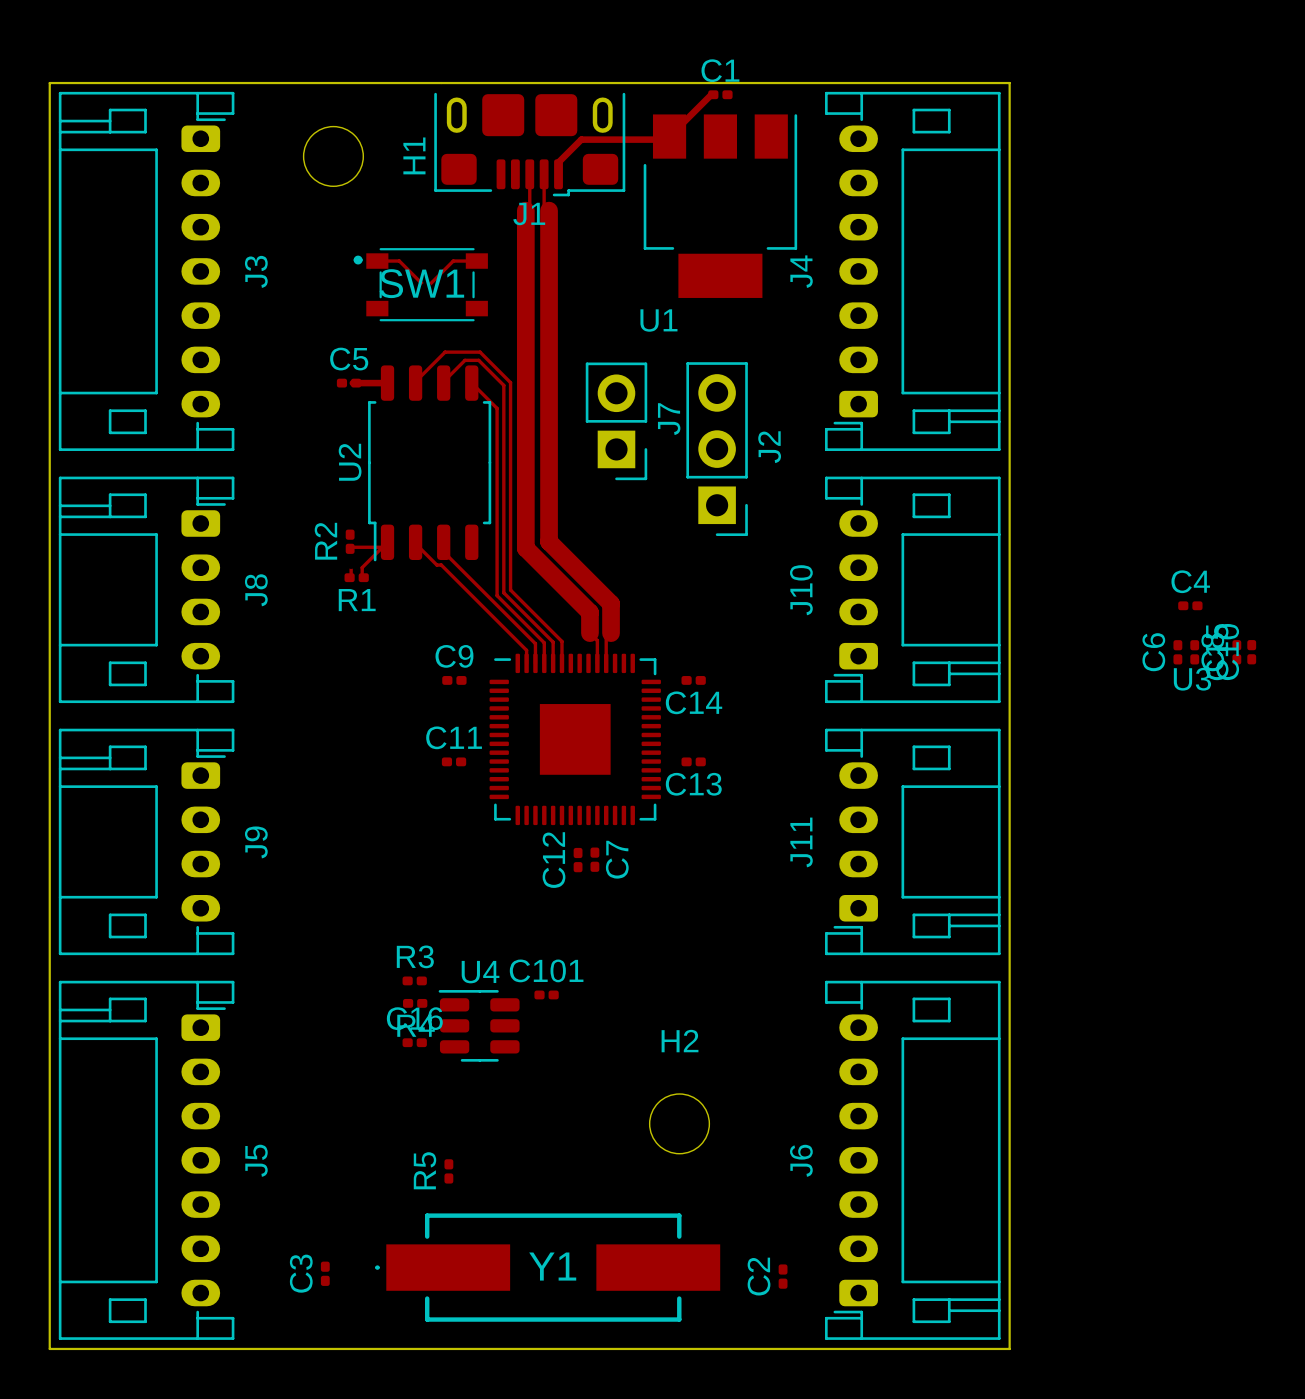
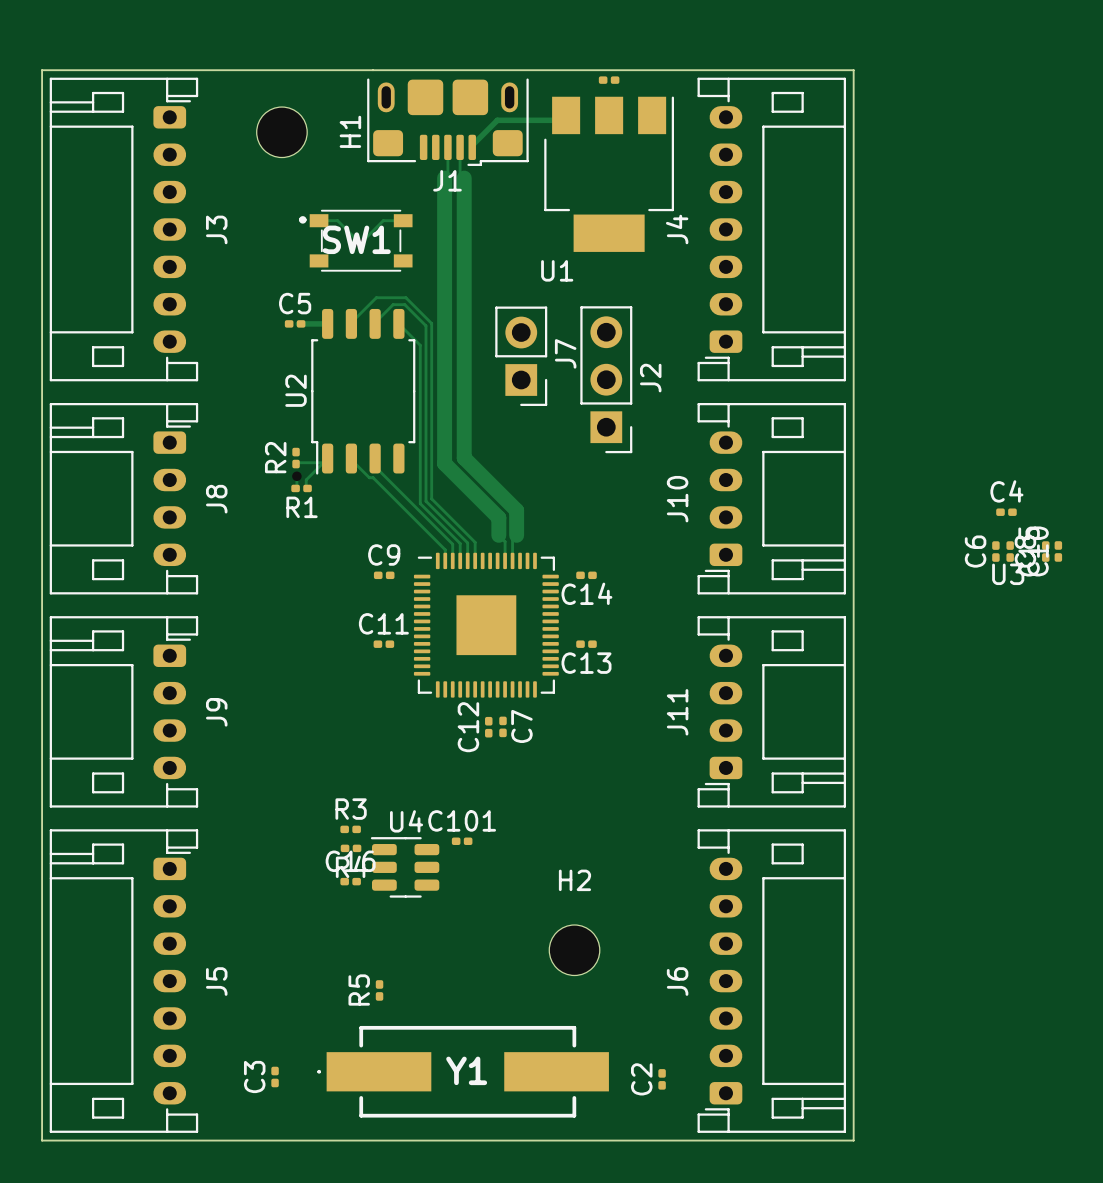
C1 name: C1 (720, 70) -> none
track: (714, 94) (711, 94) (666, 139) (581, 139) (558, 162) -> none
track: none -> (565, 120) (497, 120) (472, 145)

